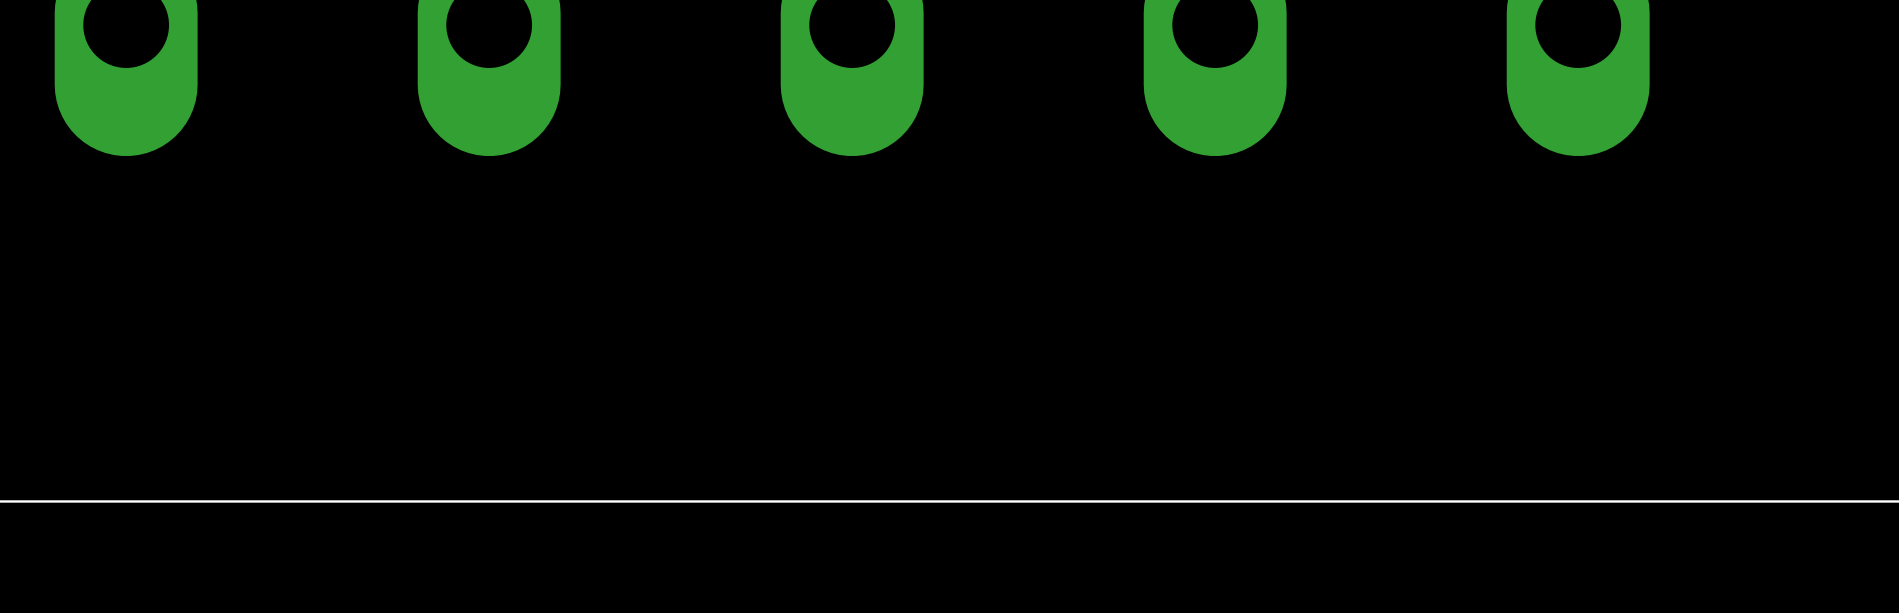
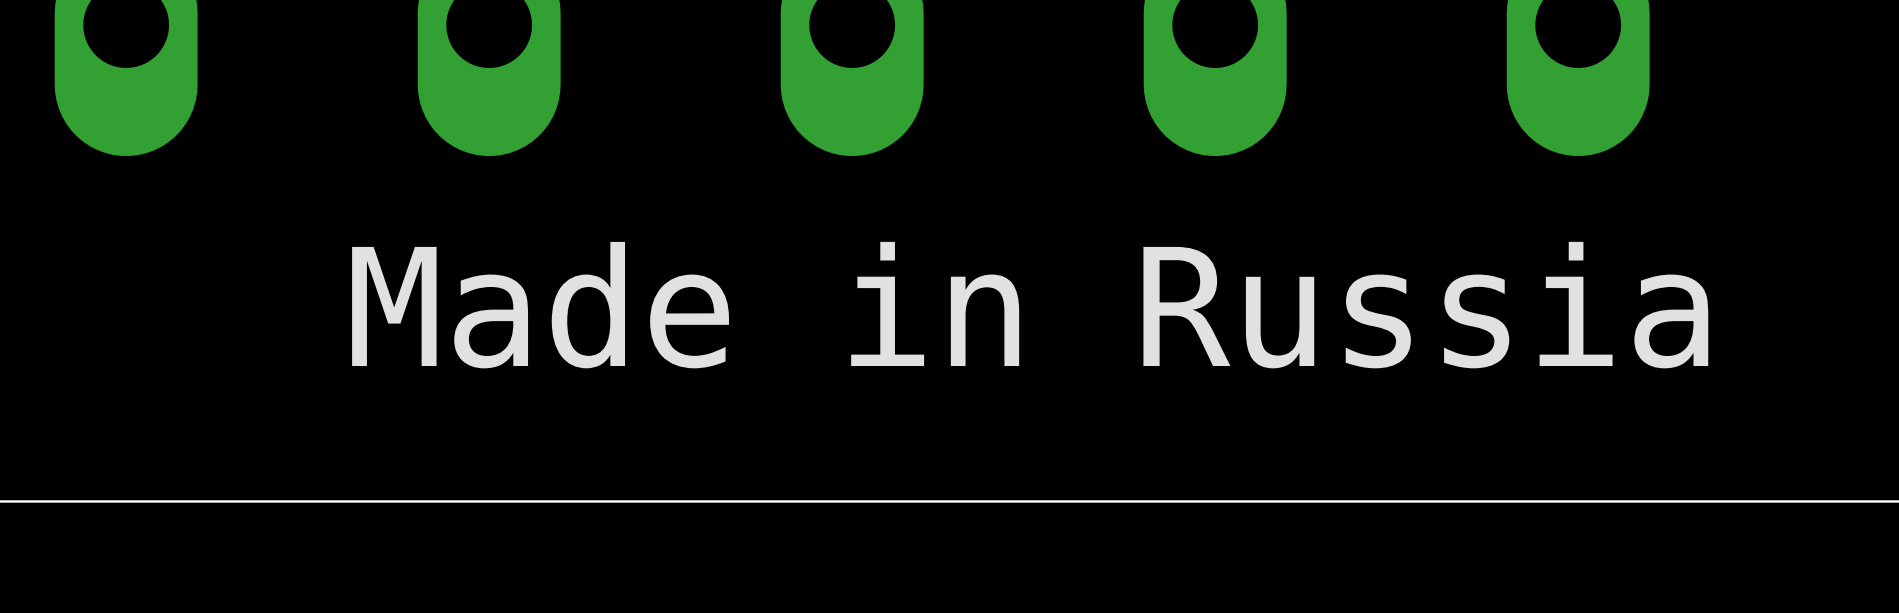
text: none -> Made in Russia (1030, 305)

